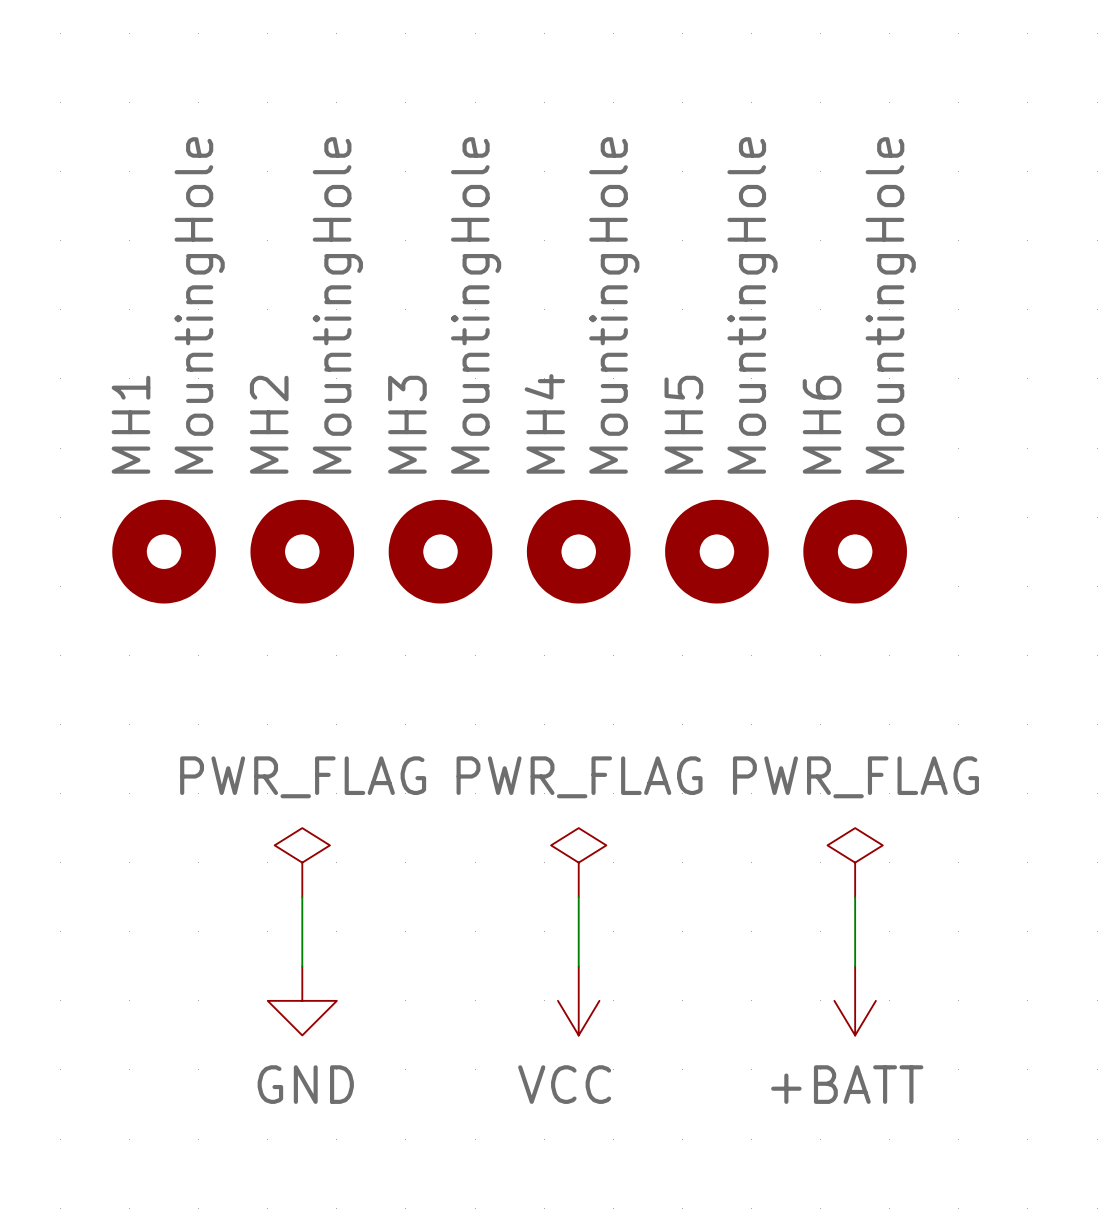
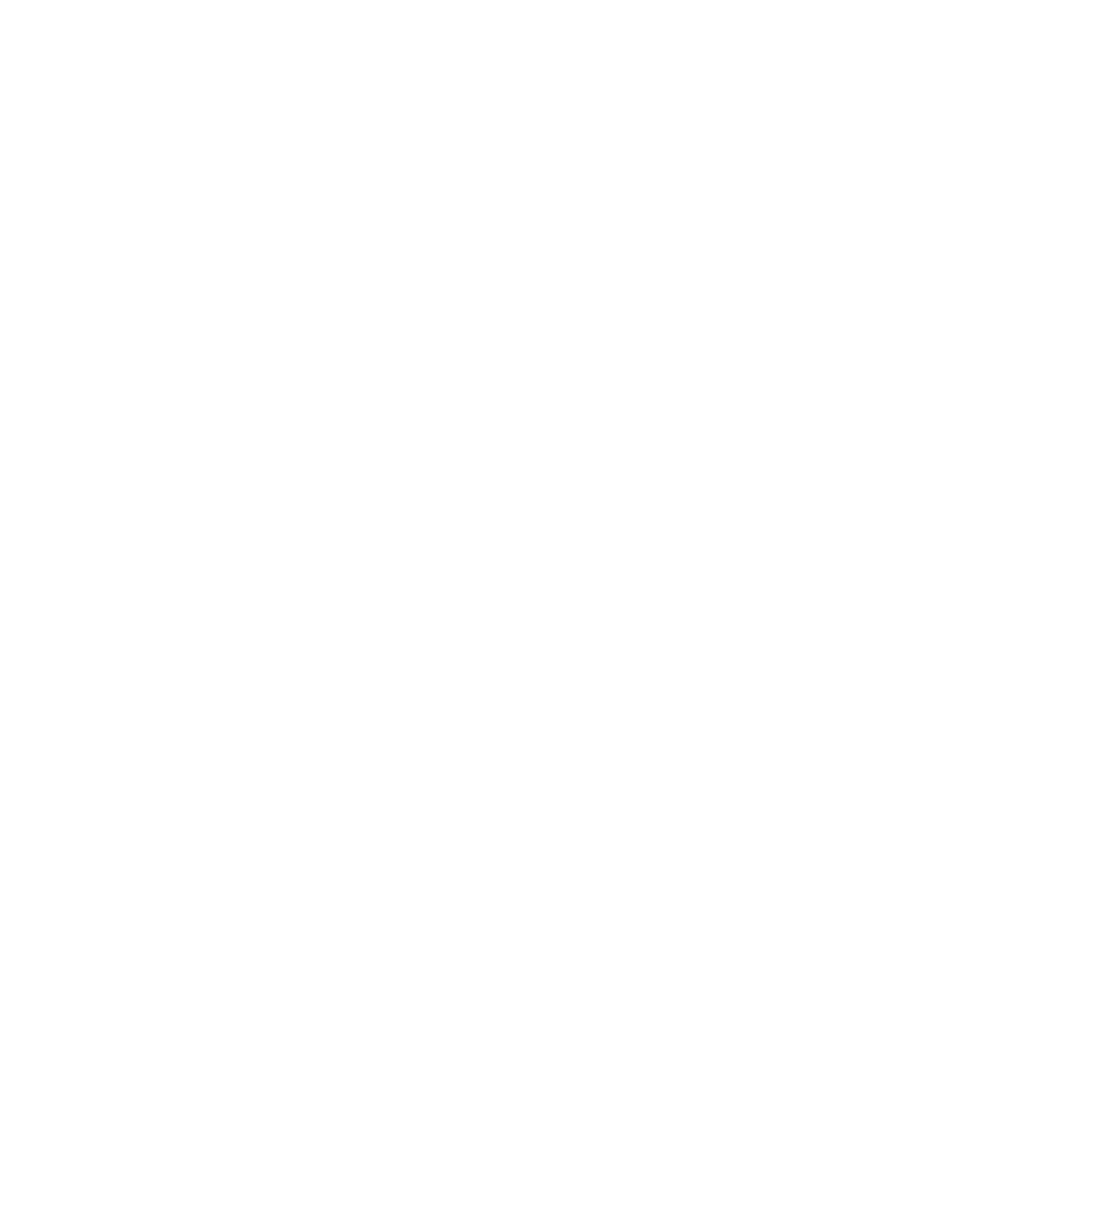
MH1: MountingHole (164, 551) -> none
MH2: MountingHole (302, 551) -> none
MH3: MountingHole (440, 551) -> none
MH4: MountingHole (578, 551) -> none
MH5: MountingHole (716, 551) -> none
MH6: MountingHole (855, 551) -> none
power symbol: PWR_FLAG (302, 862) -> none
power symbol: PWR_FLAG (578, 862) -> none
power symbol: PWR_FLAG (855, 862) -> none
wire: (302, 897) (302, 966) -> none
wire: (578, 897) (578, 966) -> none
wire: (855, 897) (855, 966) -> none
power symbol: GND (302, 1000) -> none
power symbol: VCC (578, 1000) -> none
power symbol: +BATT (855, 1000) -> none

